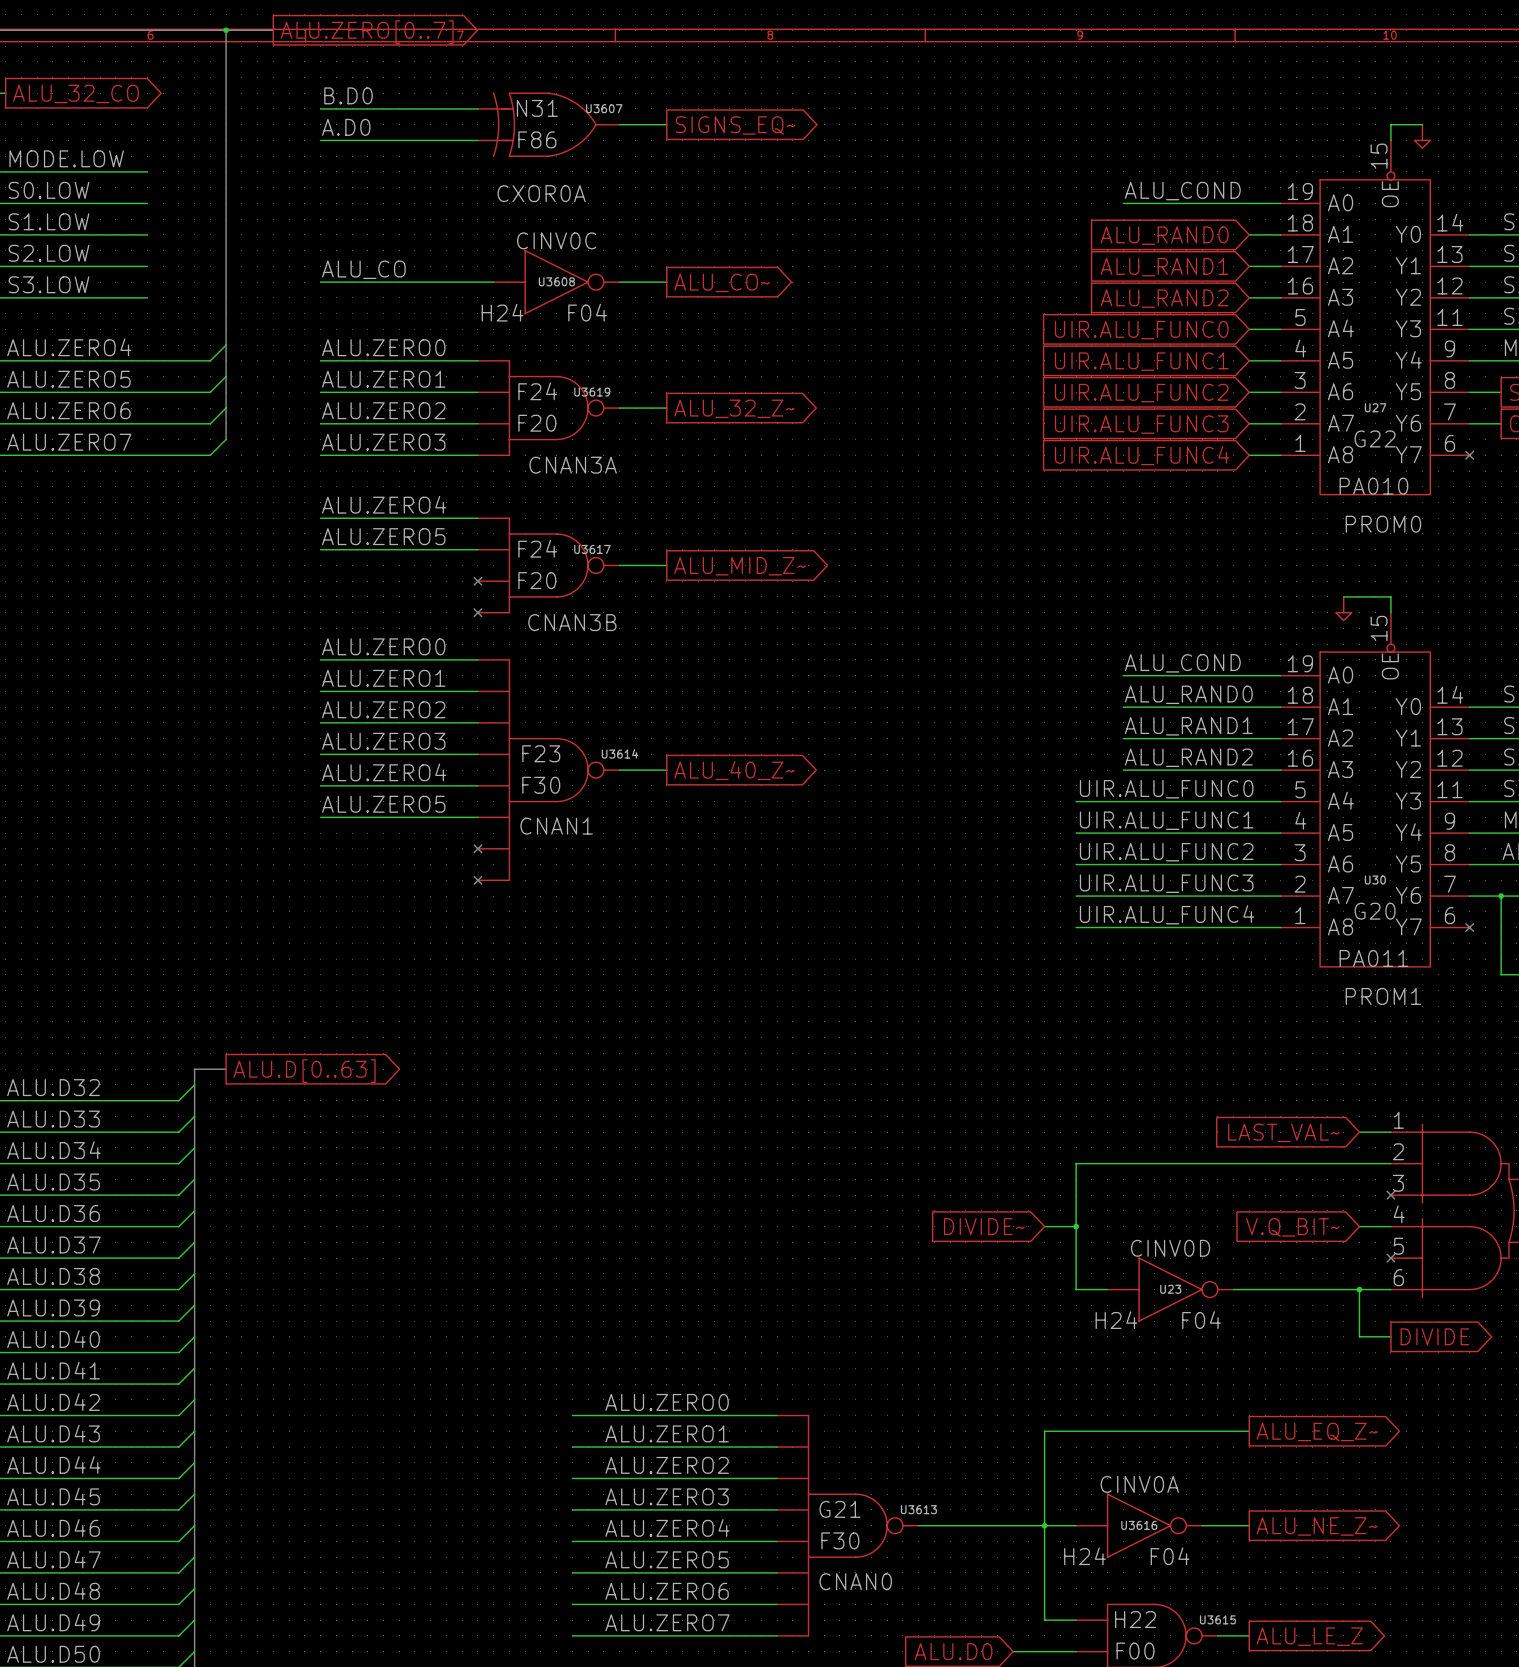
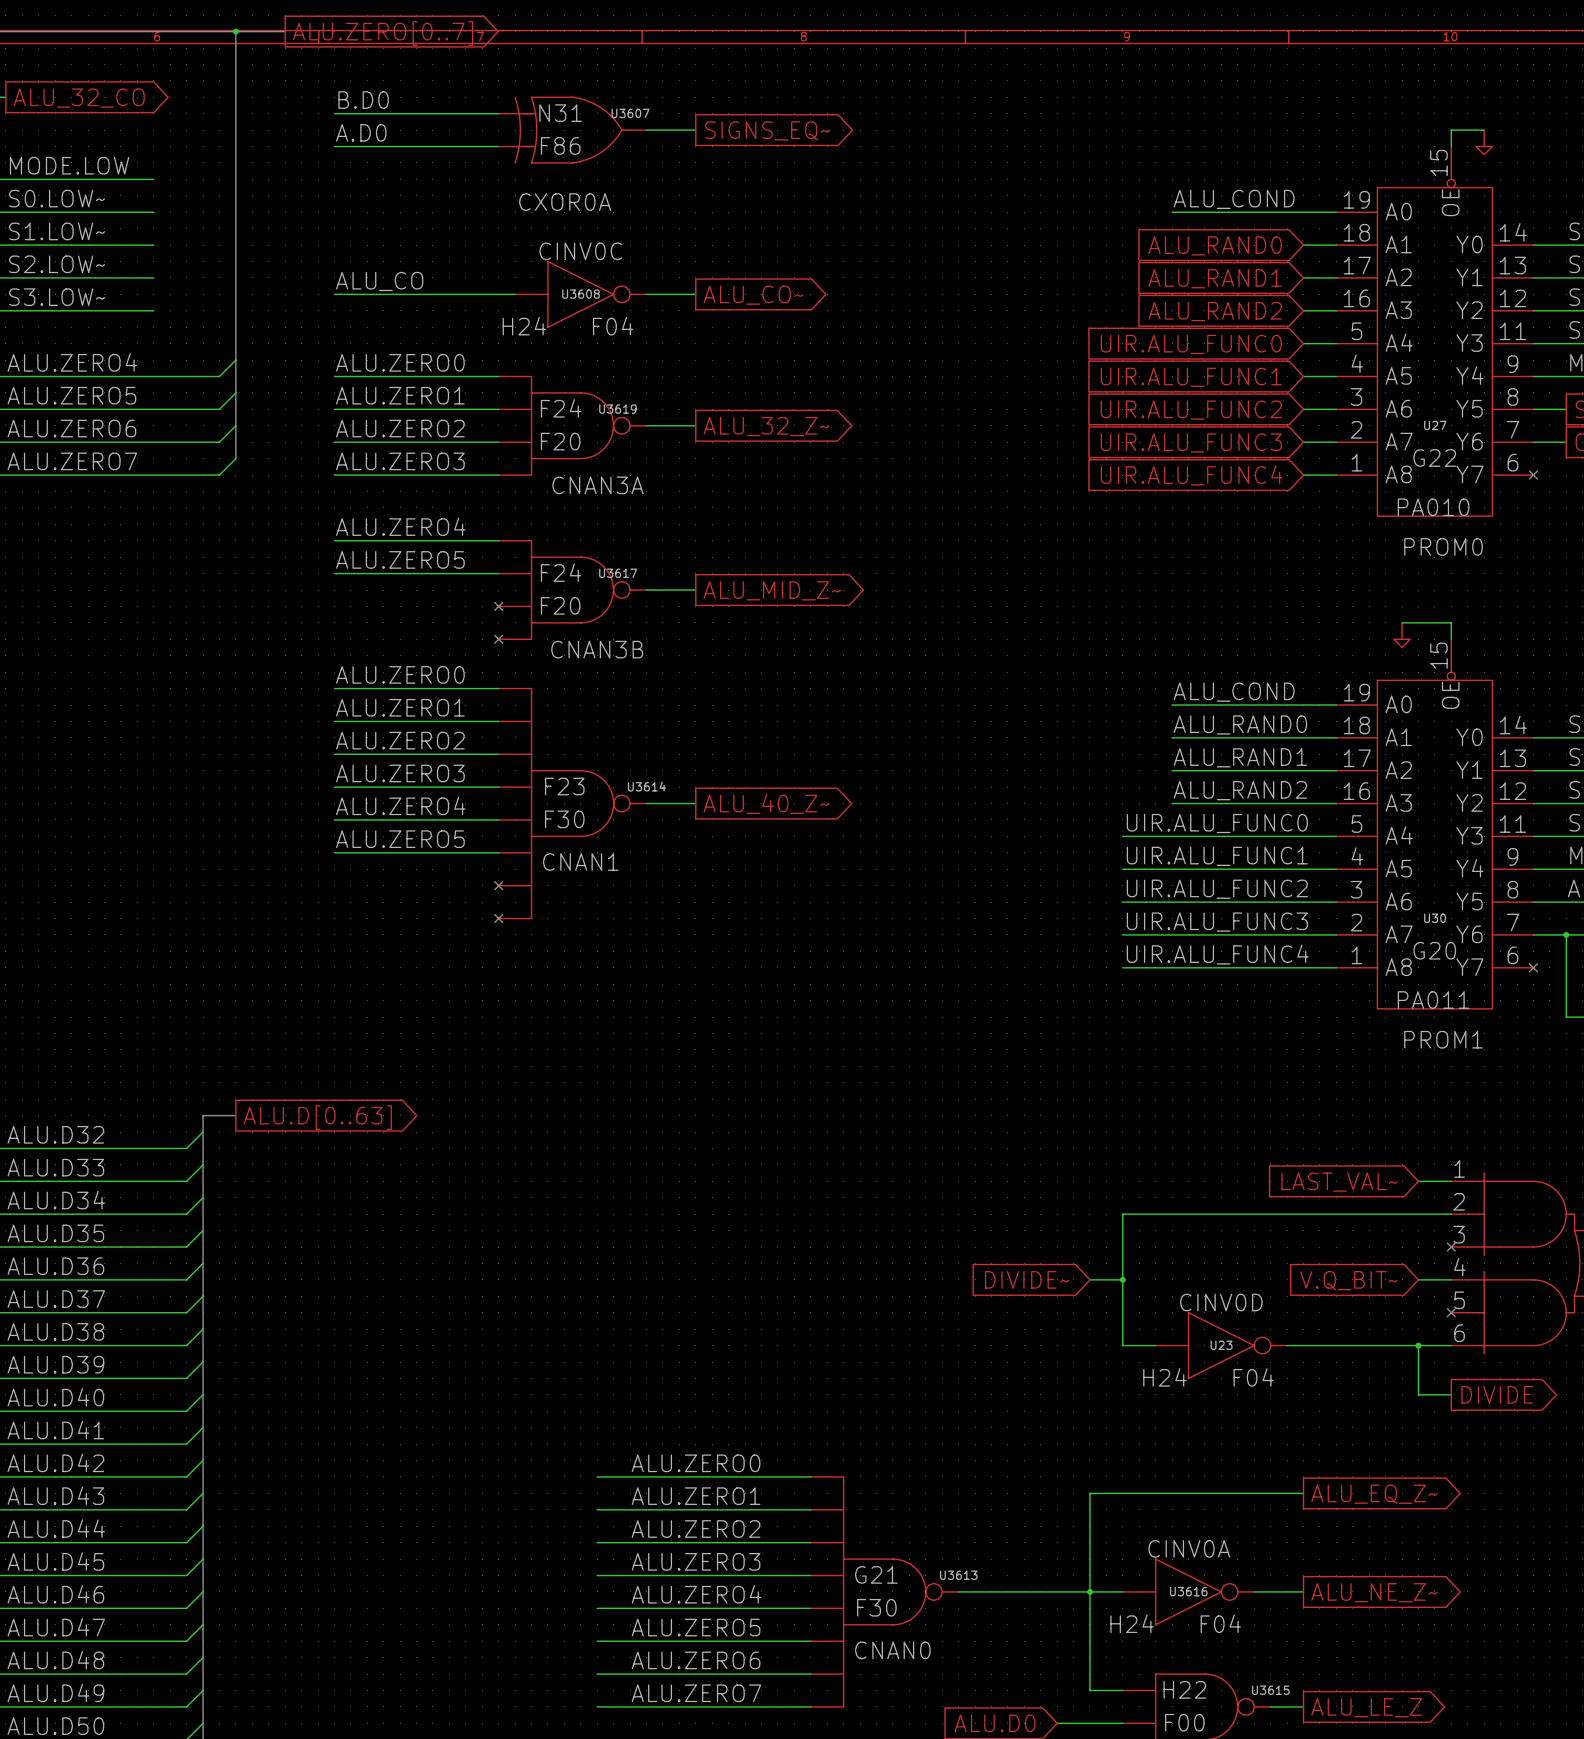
label: S0.LOW (49, 190) -> S0.LOW~ (57, 198)
label: S1.LOW (49, 221) -> S1.LOW~ (57, 231)
label: S2.LOW (49, 253) -> S2.LOW~ (57, 264)
label: S3.LOW (49, 284) -> S3.LOW~ (57, 297)

